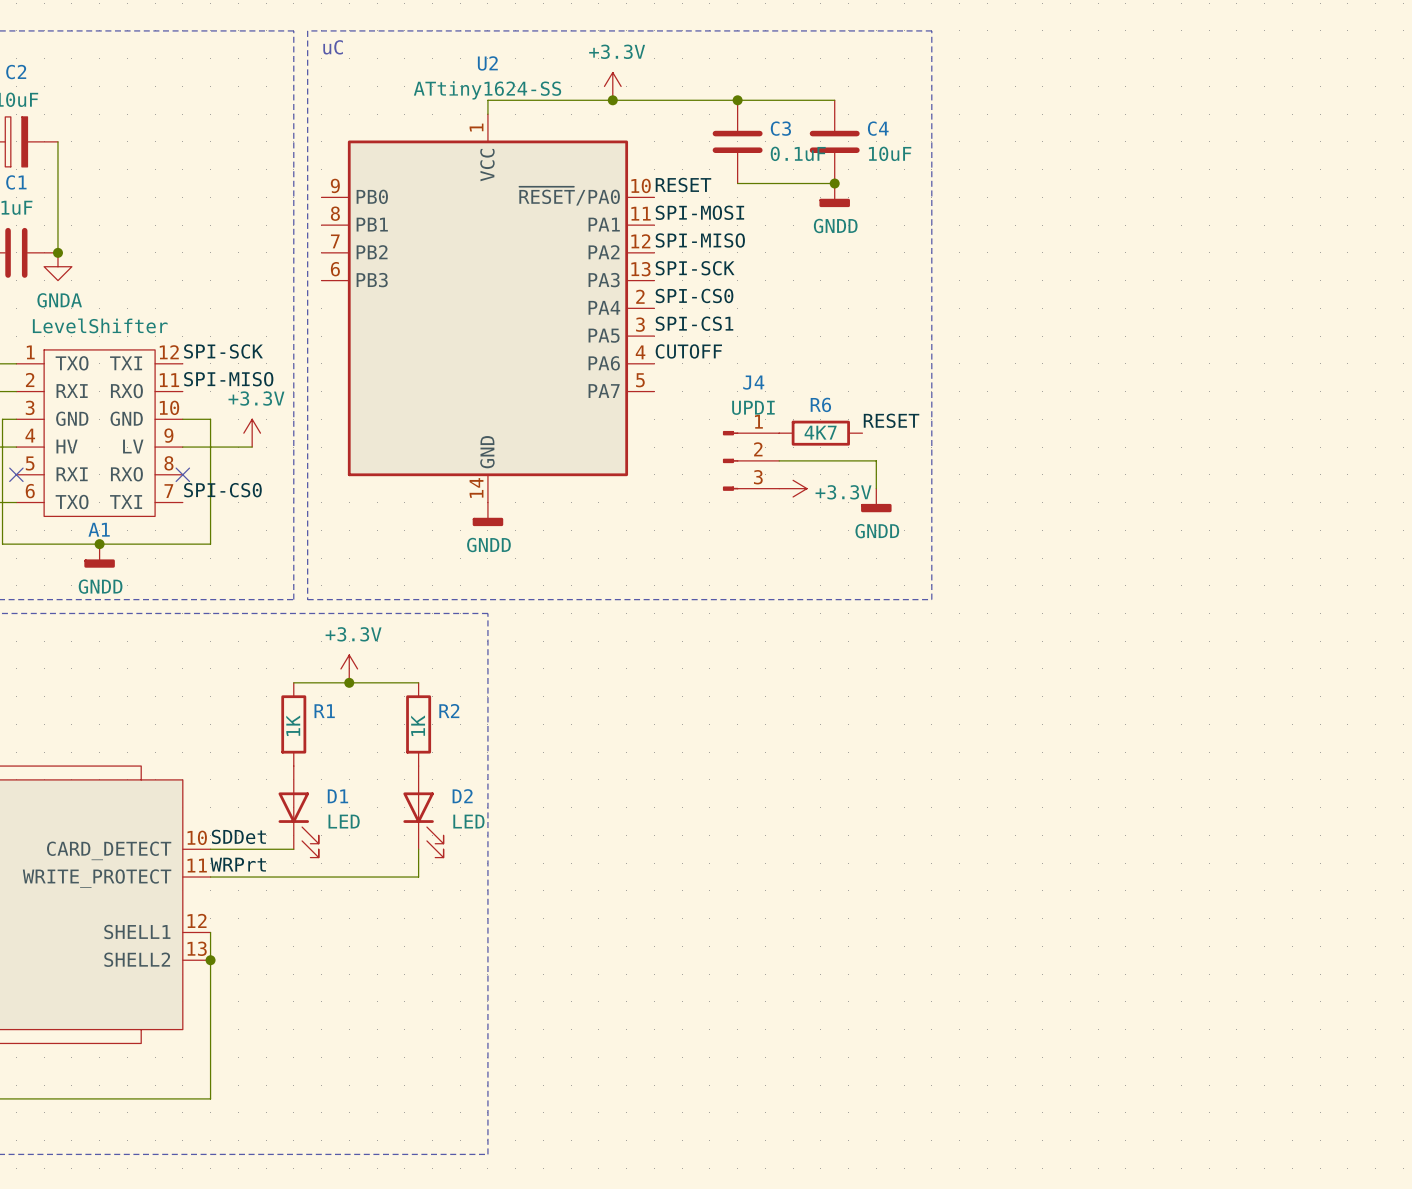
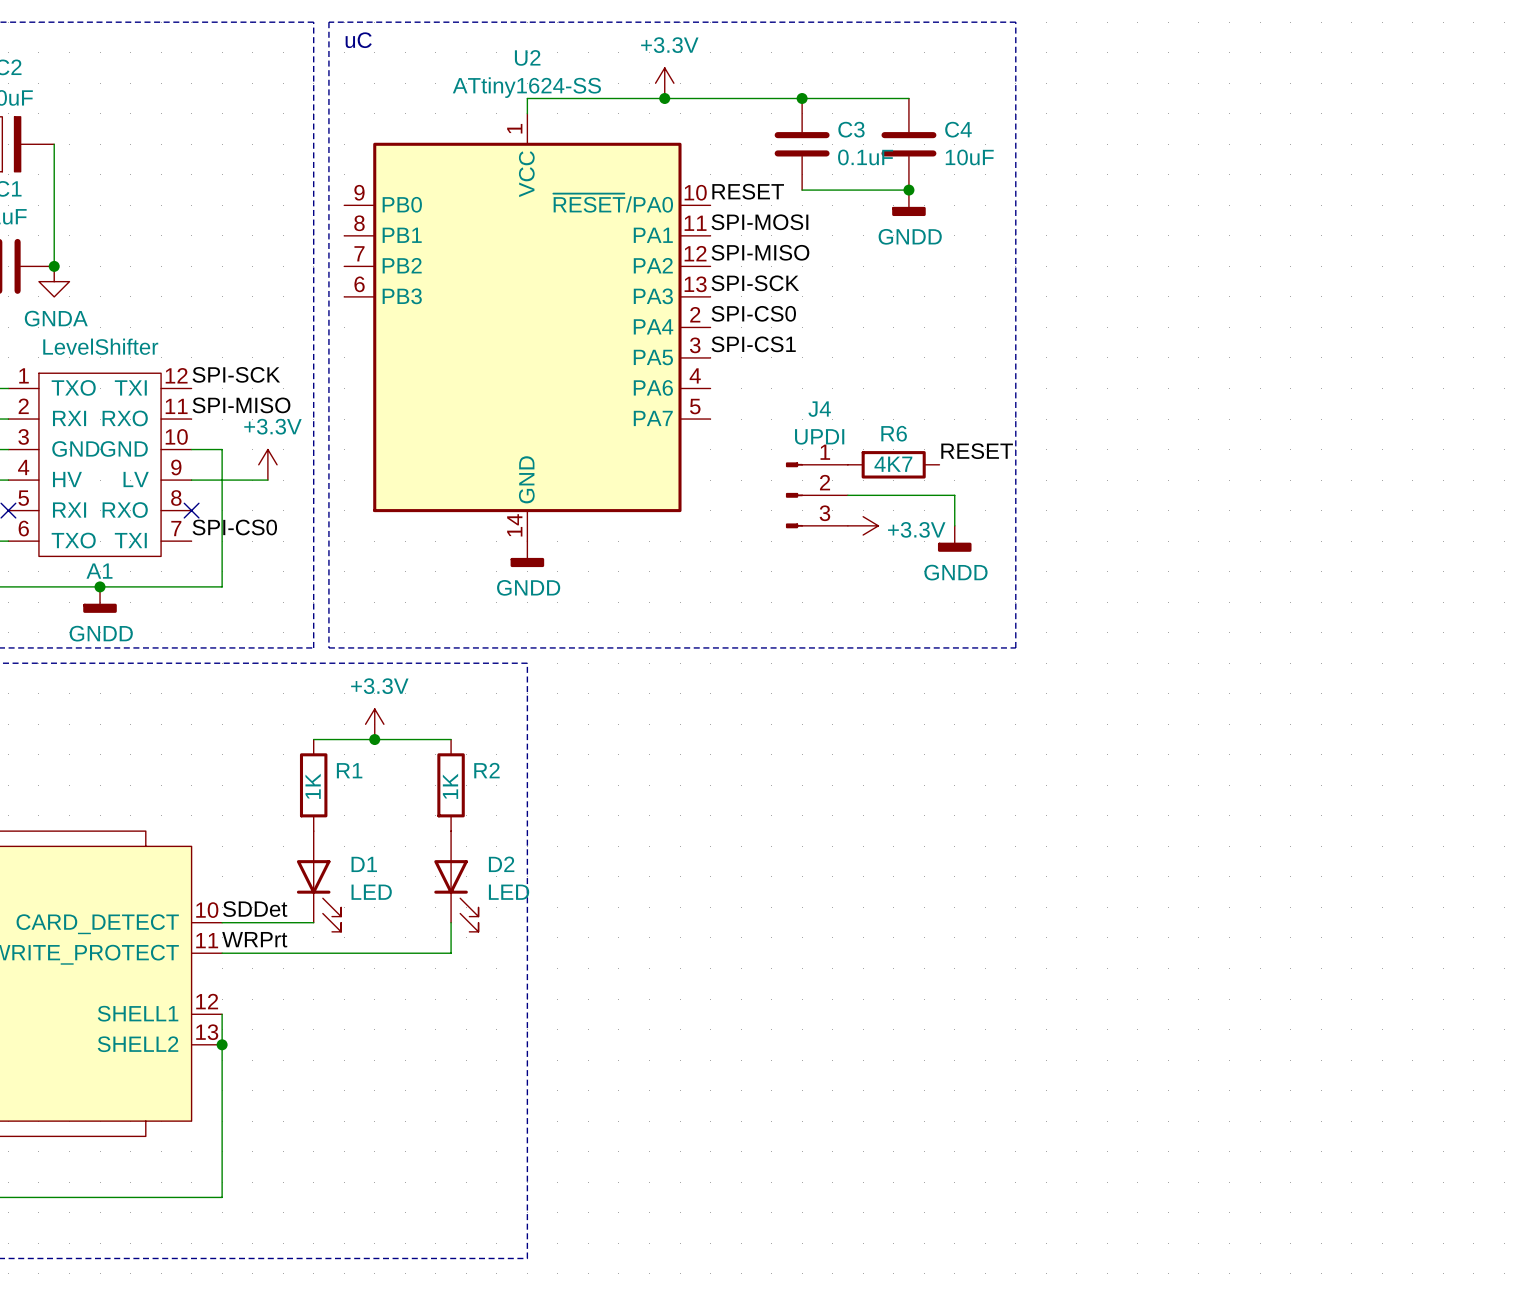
label: CUTOFF (688, 351) -> none

